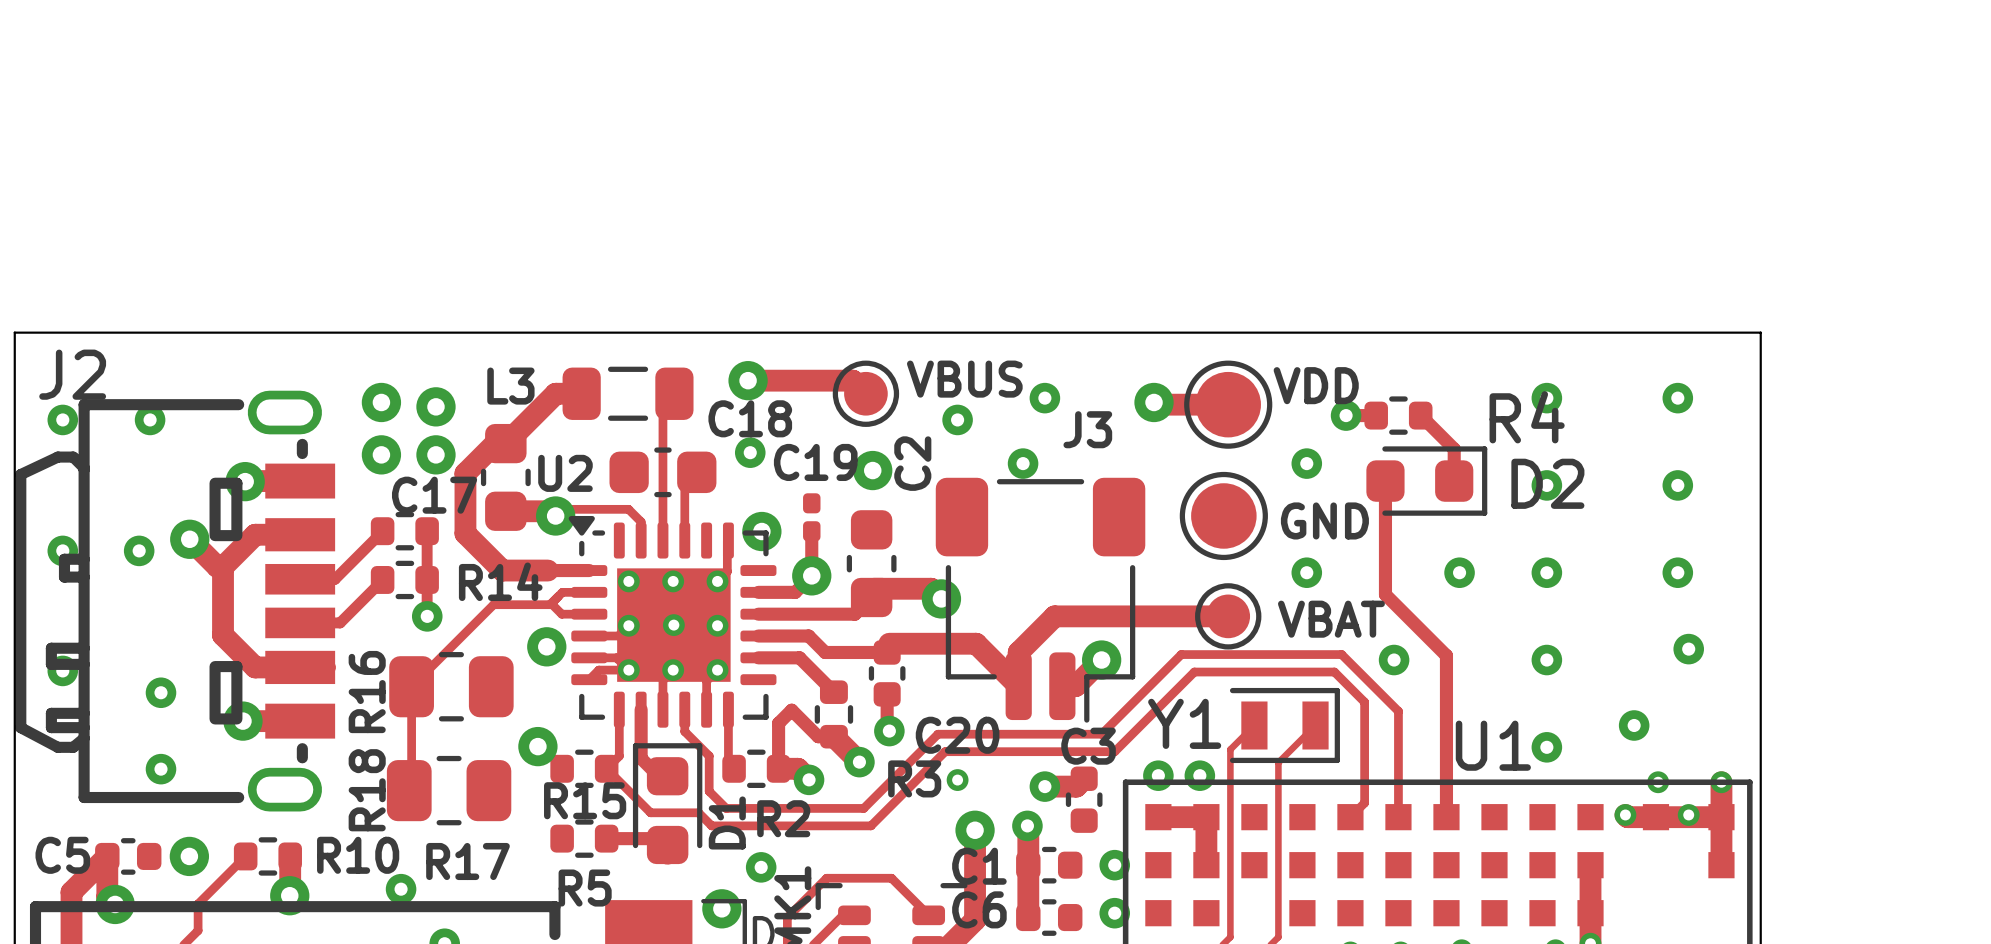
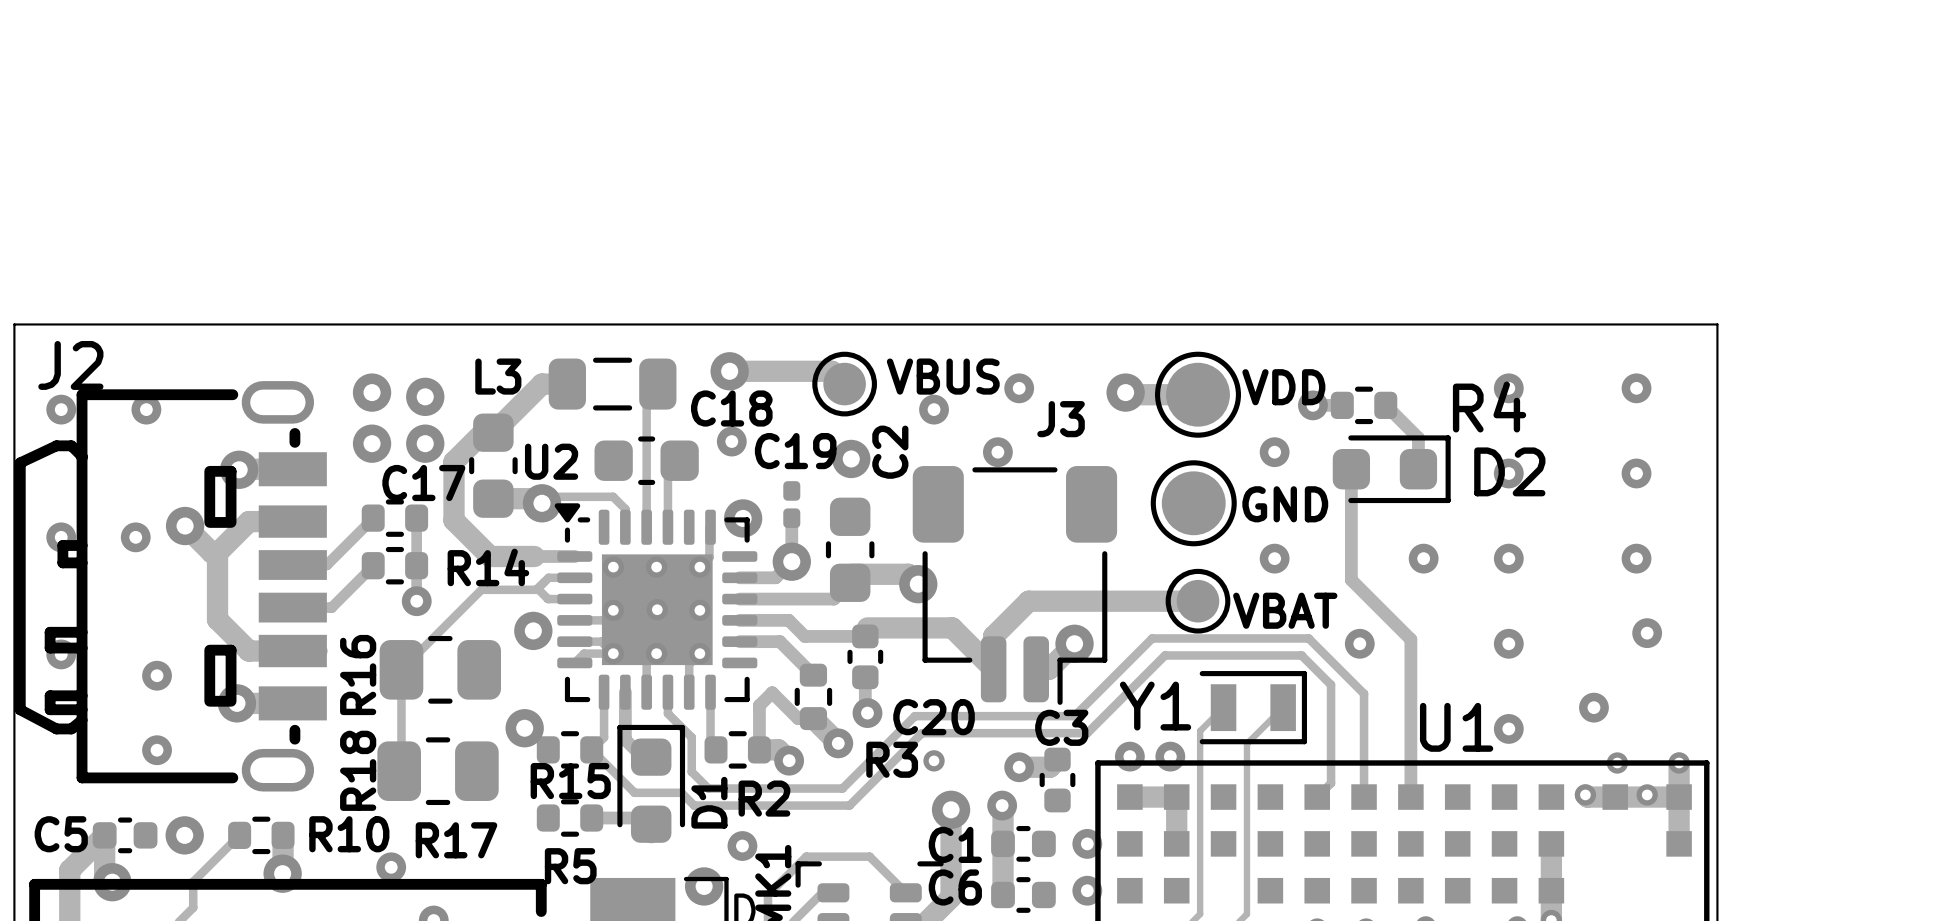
text: VBUS (964, 379) -> none
text: VDD (1316, 385) -> none
VBUS name: none -> VBUS (943, 376)
VDD name: none -> VDD (1283, 387)
GND name: none -> GND (1285, 504)
text: GND (1324, 520) -> none
text: VBAT (1331, 619) -> none
VBAT name: none -> VBAT (1285, 610)

